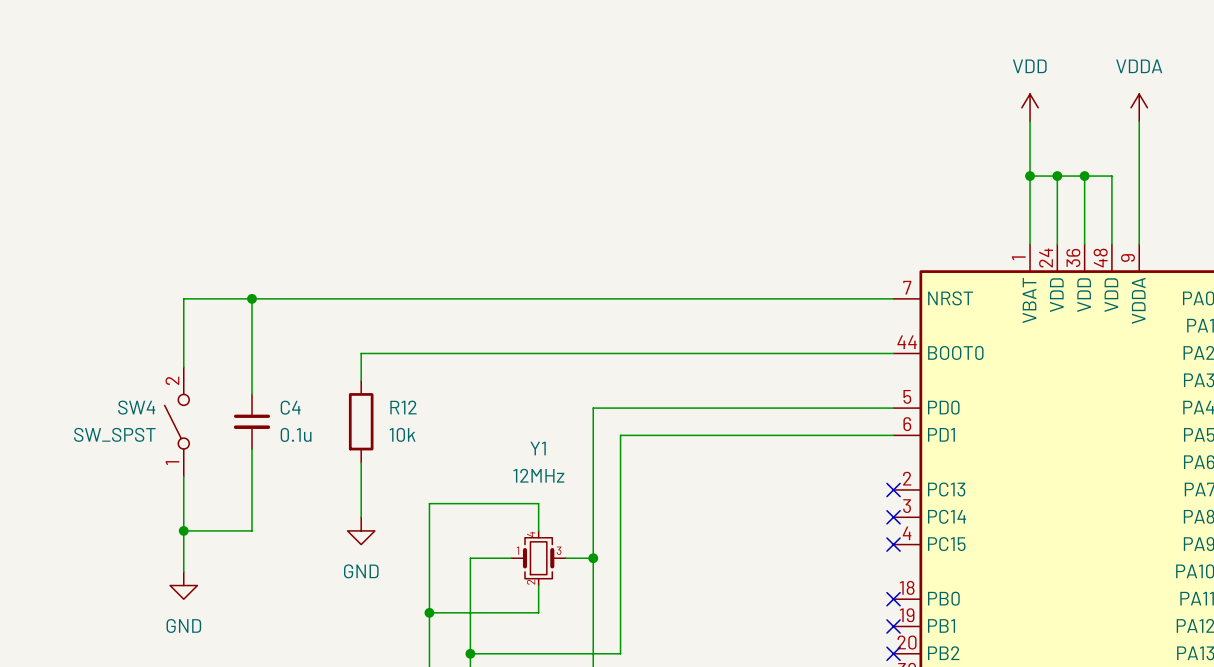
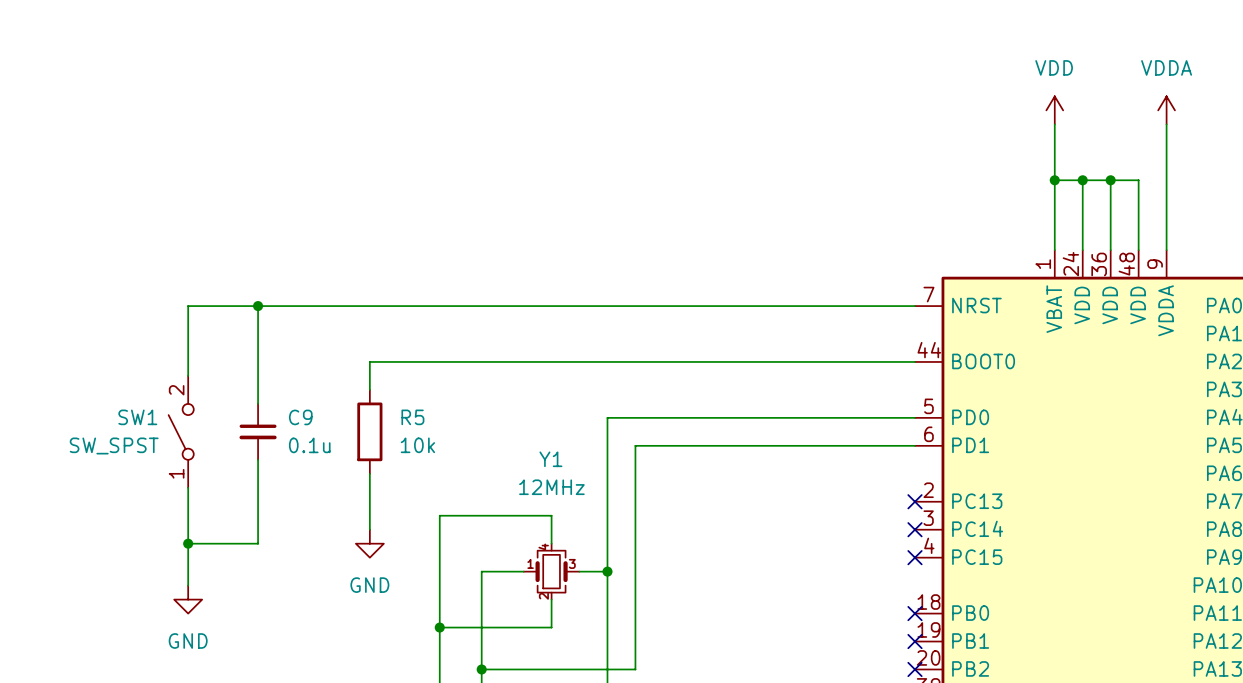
SW4 name: SW4 (136, 407) -> SW1 (137, 417)
C4 name: C4 (290, 407) -> C9 (300, 417)
R12 name: R12 (403, 407) -> R5 (412, 417)

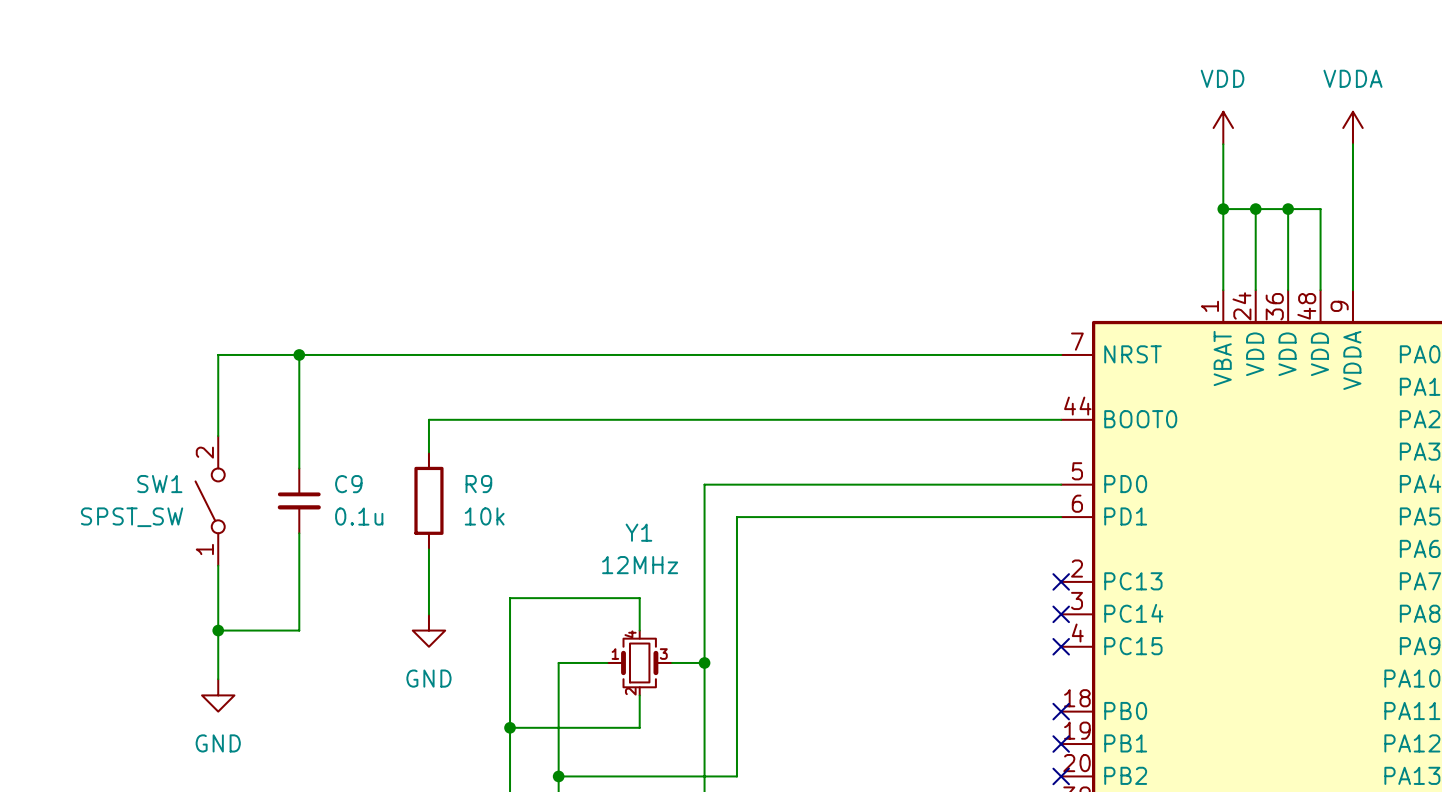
R5 name: R5 (412, 417) -> R9 (478, 484)
SW1 value: SW_SPST (114, 445) -> SPST_SW (132, 517)

